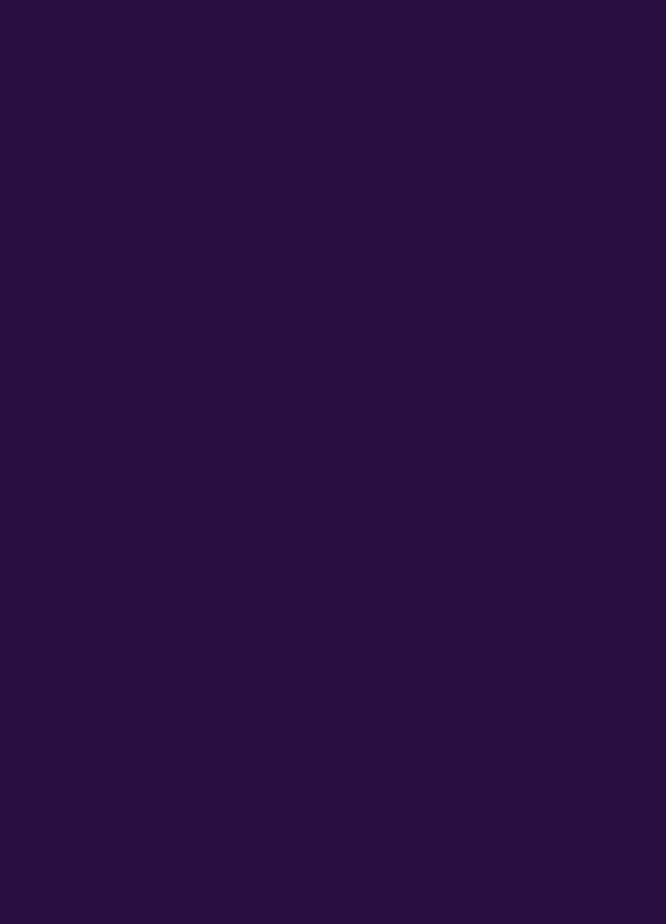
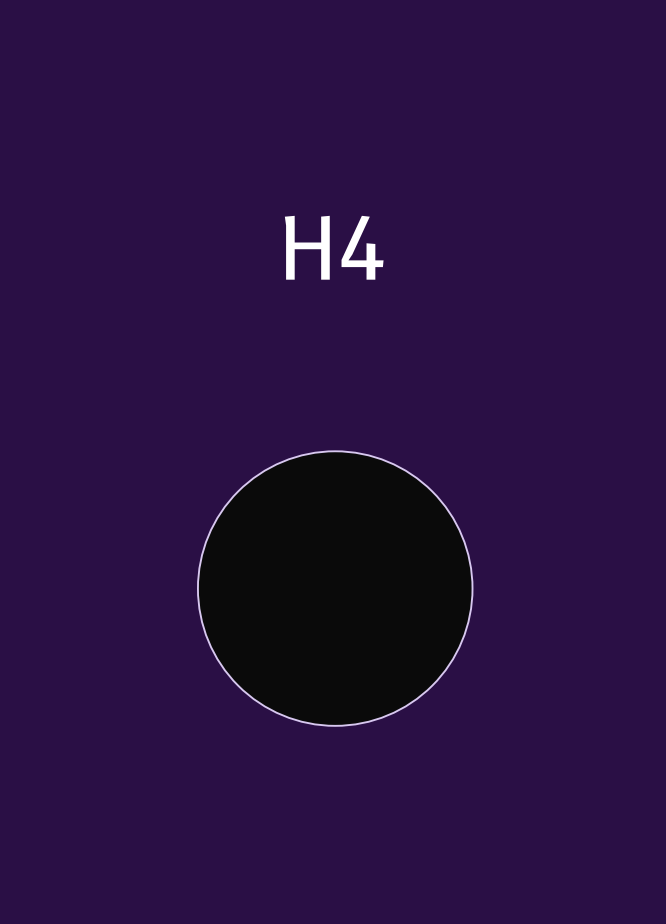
H4: none -> (335, 588)

